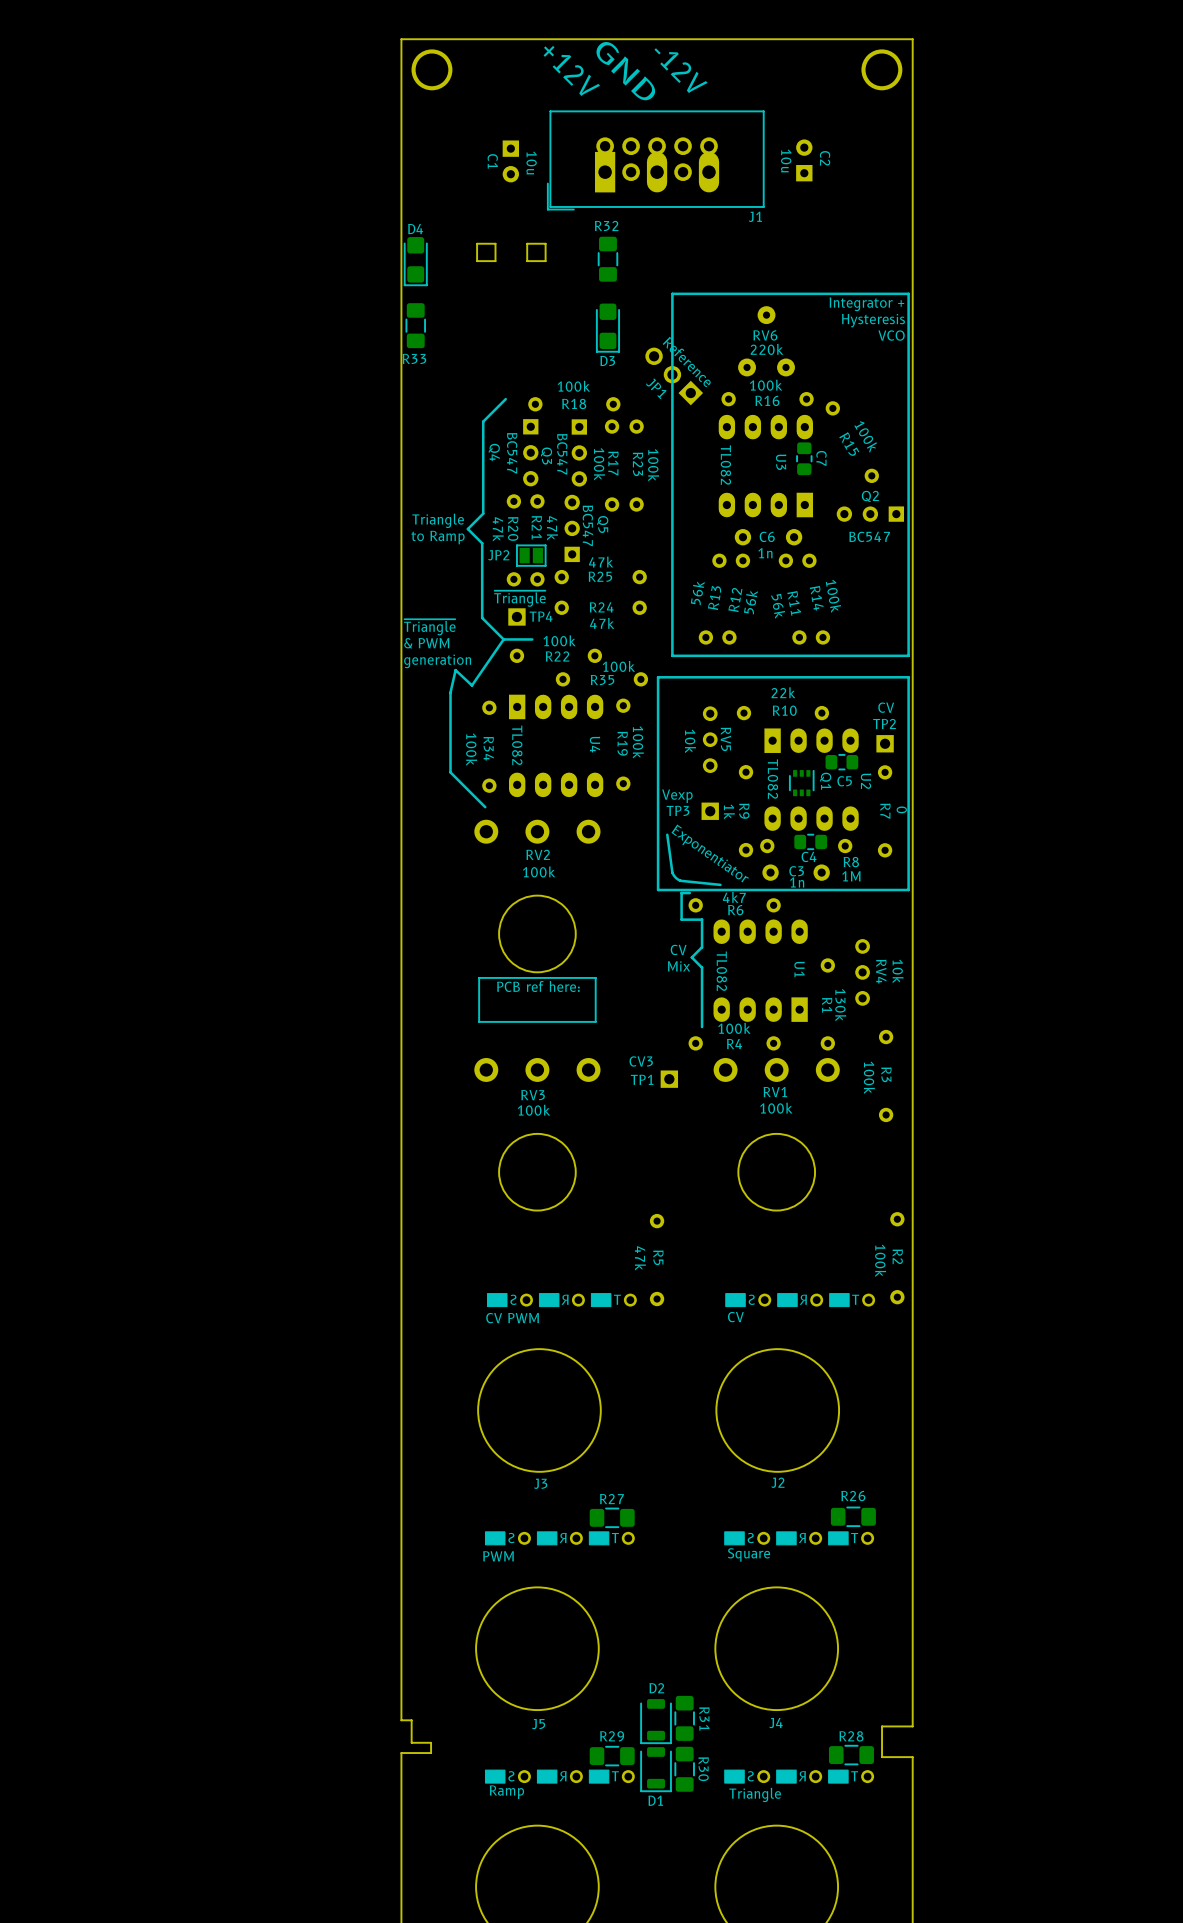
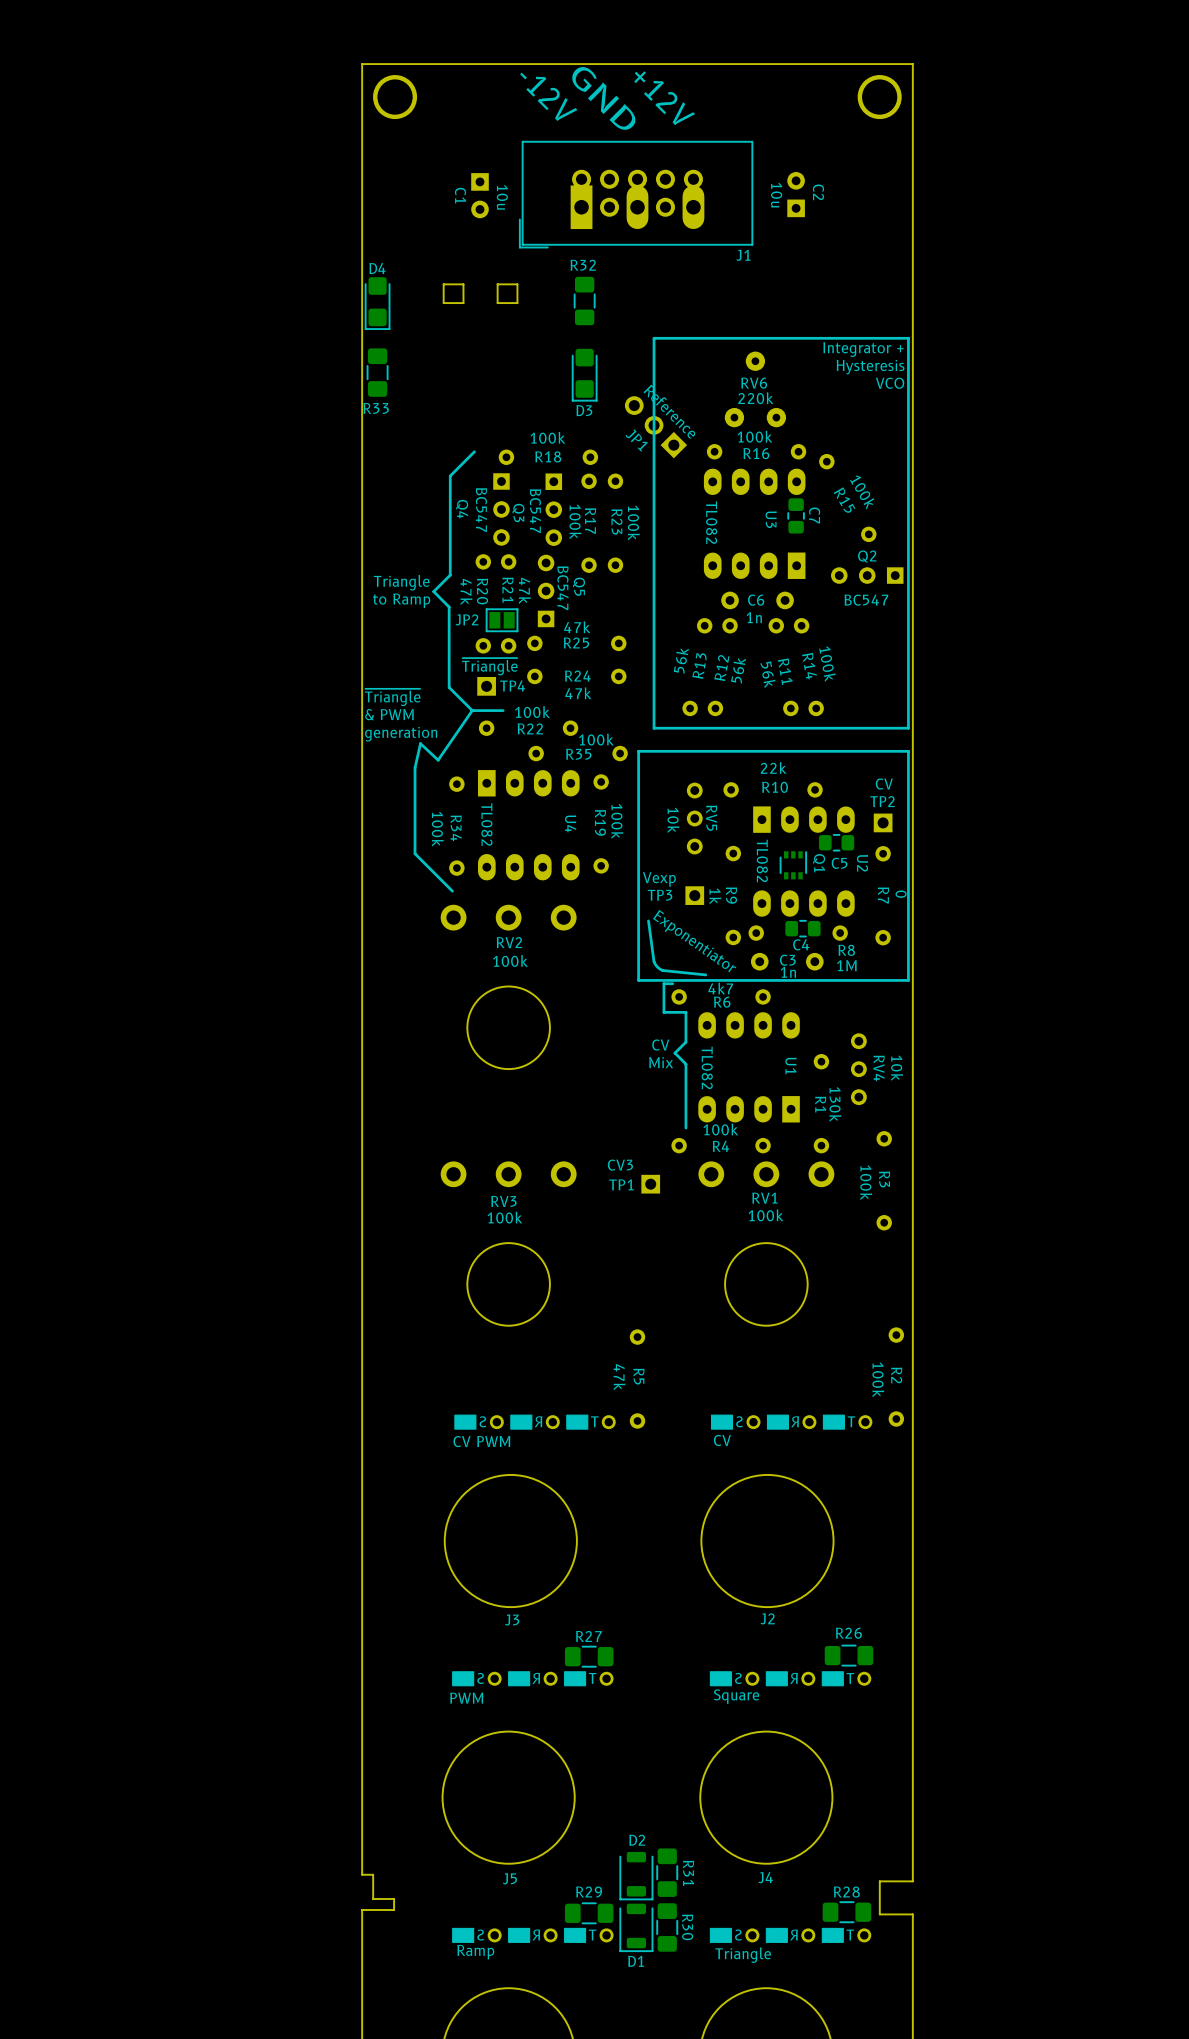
text: +12V (571, 70) -> -12V (548, 96)
text: -12V (681, 70) -> +12V (664, 98)
line: (595, 977) (595, 1021) (479, 1021) (479, 977) (595, 977) -> none
text: PCB ref here: (538, 986) -> none

